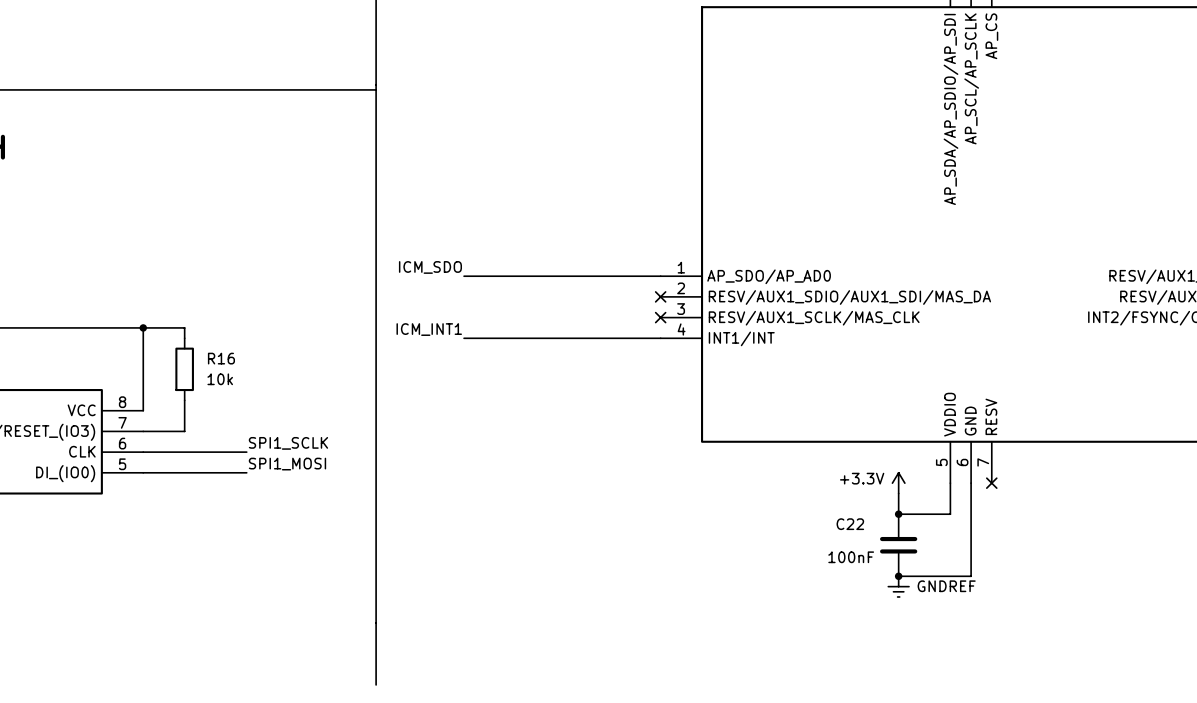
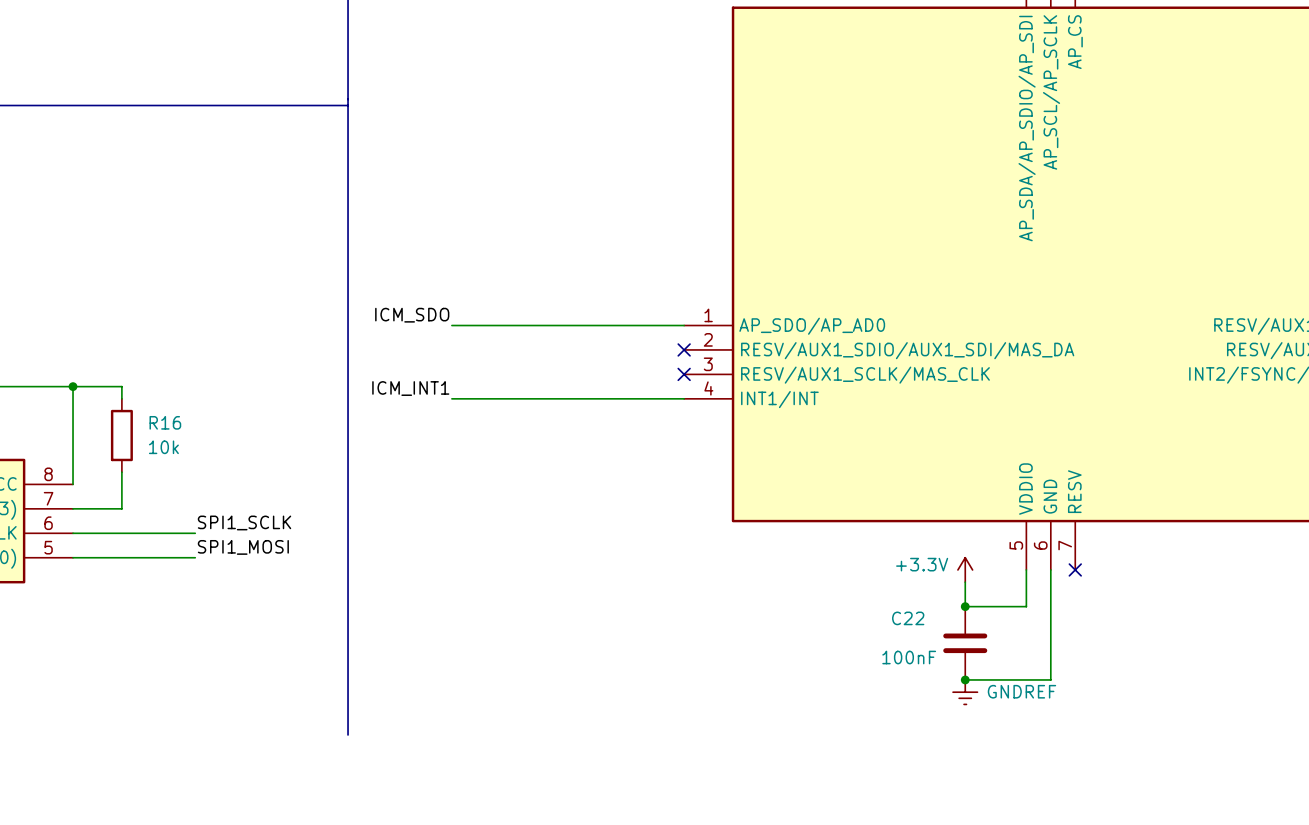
line: (376, 622) (376, 684) -> none

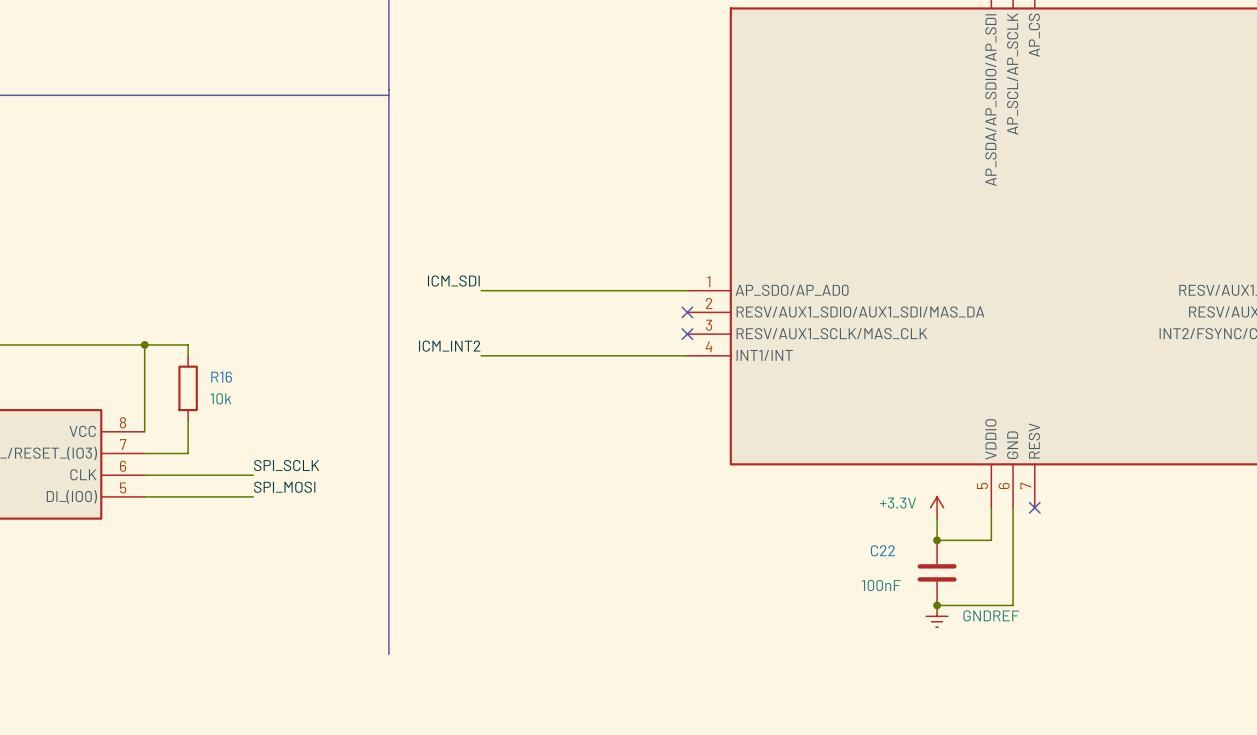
label: ICM_SDO (412, 315) -> ICM_SDI (453, 281)
label: ICM_INT1 (410, 388) -> ICM_INT2 (449, 346)
label: SPI1_SCLK (244, 522) -> SPI_SCLK (286, 465)
label: SPI1_MOSI (243, 547) -> SPI_MOSI (284, 487)

